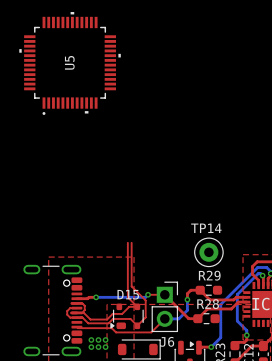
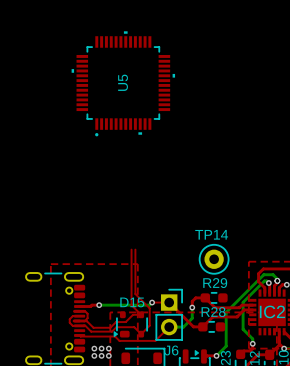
U5 position: (70, 63) -> (123, 83)

